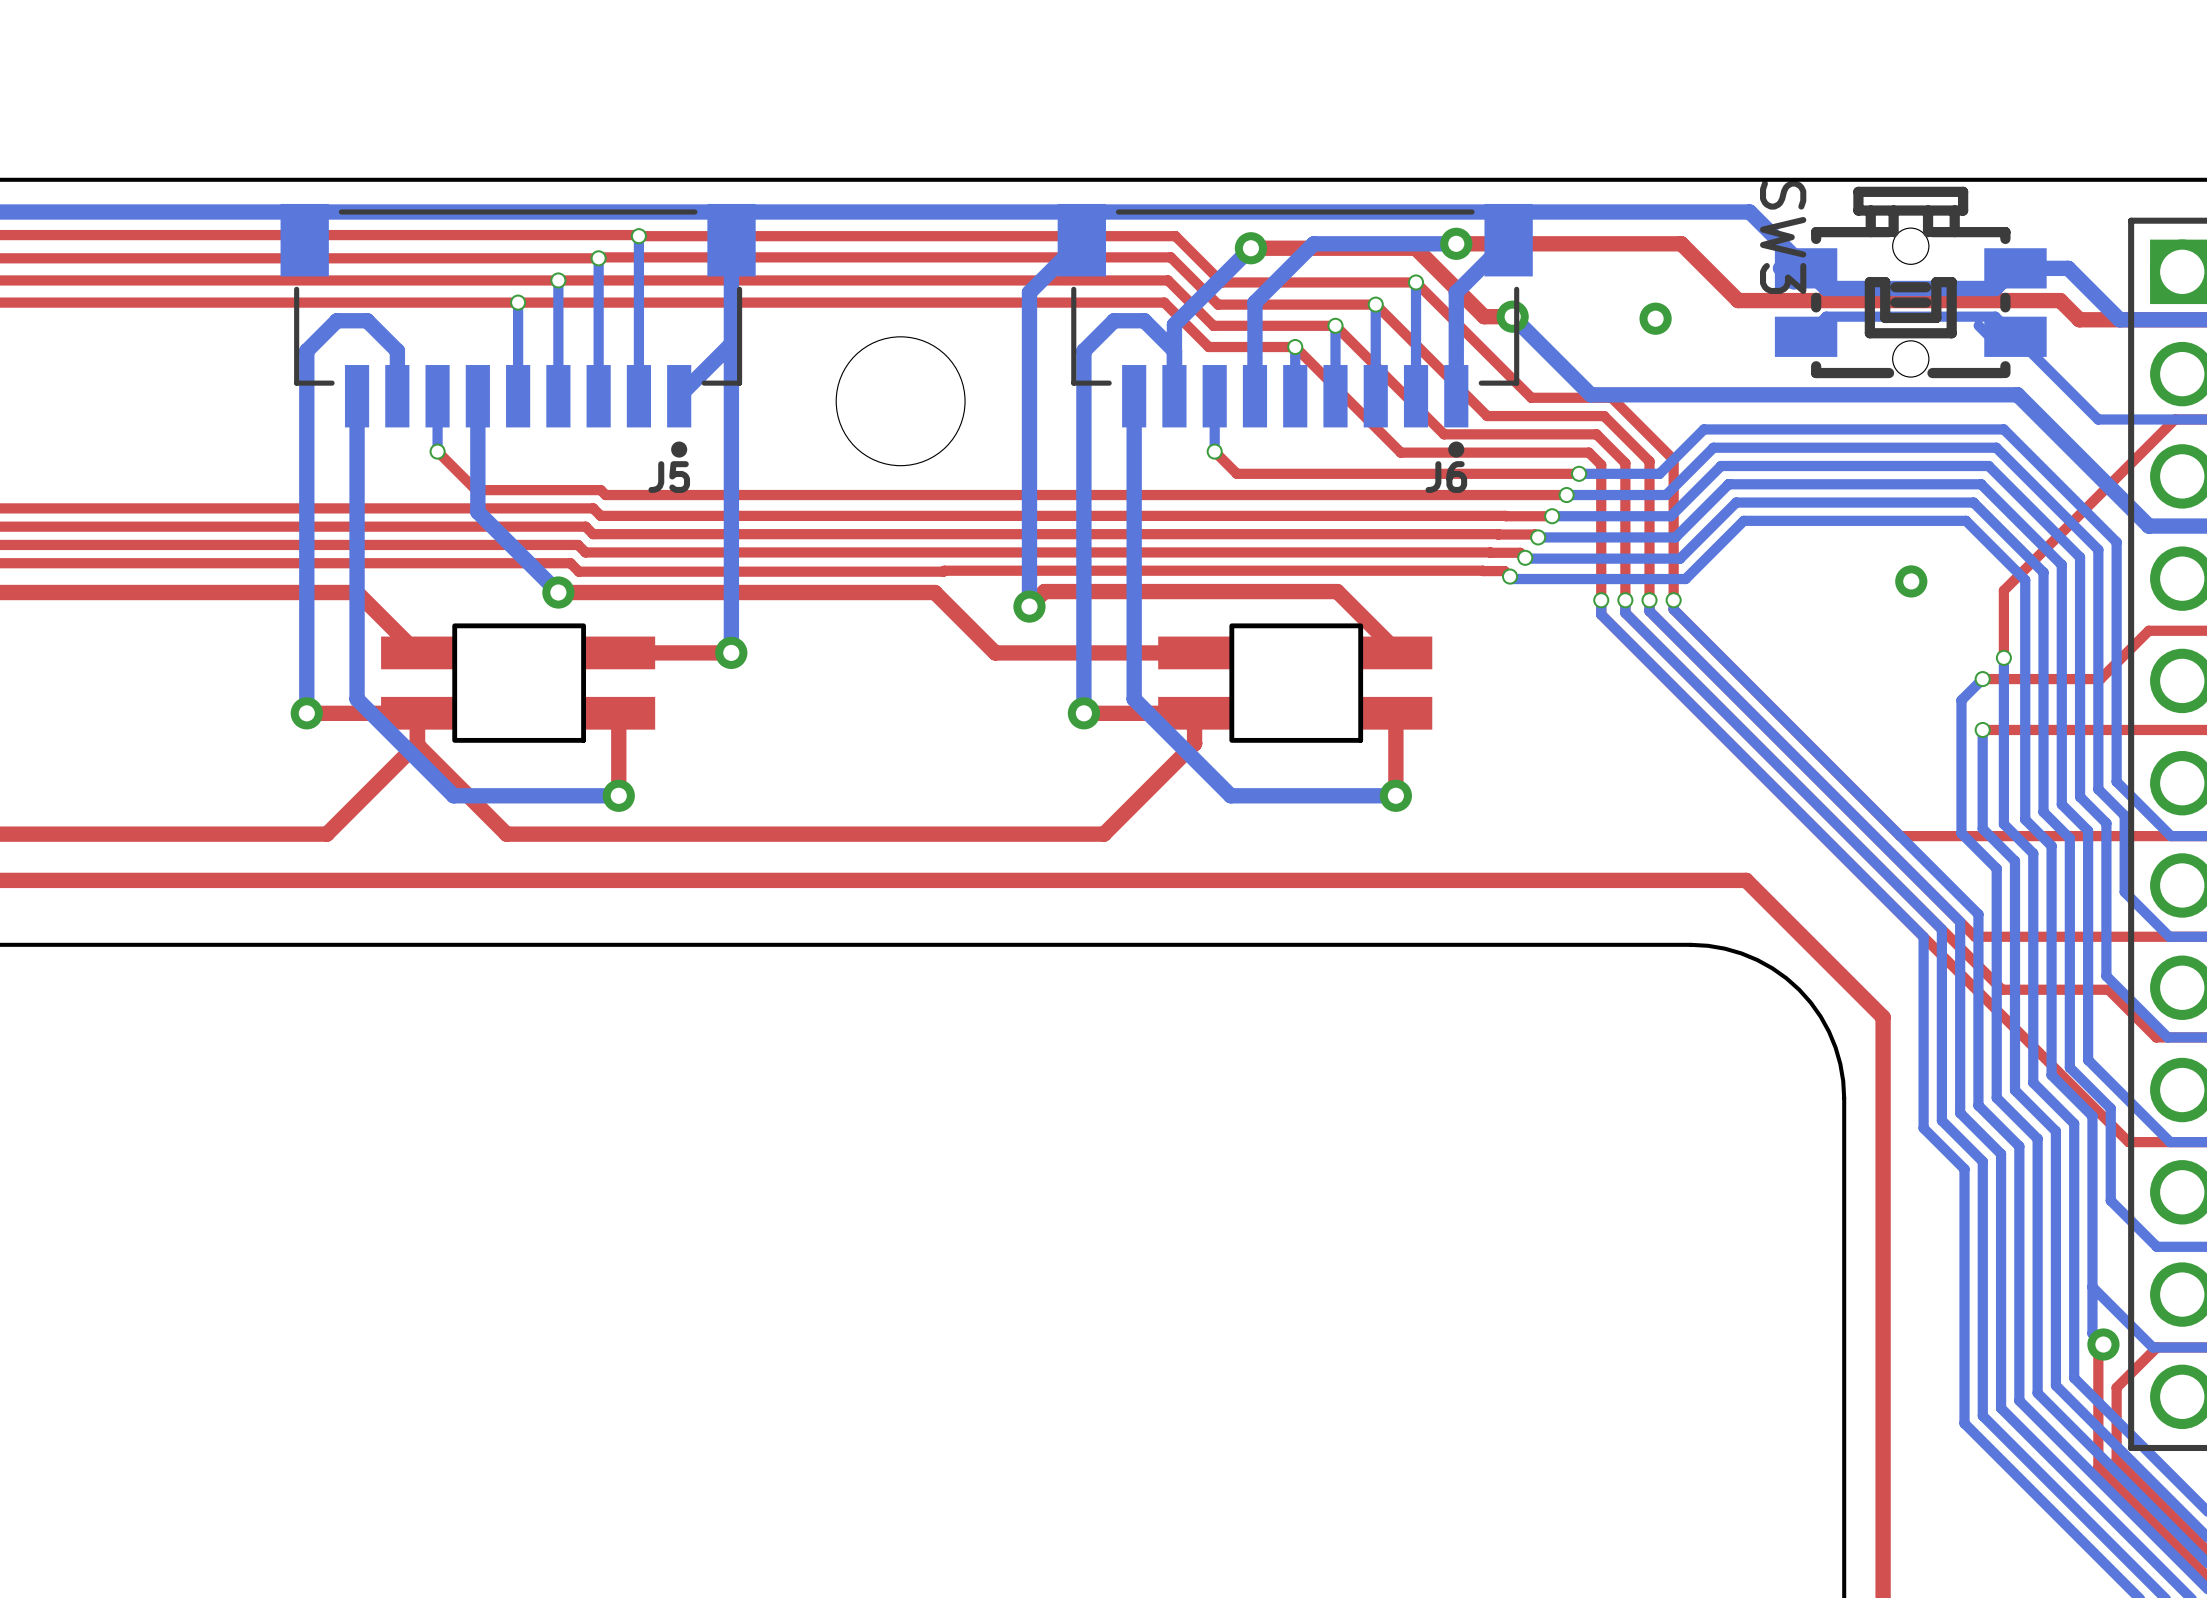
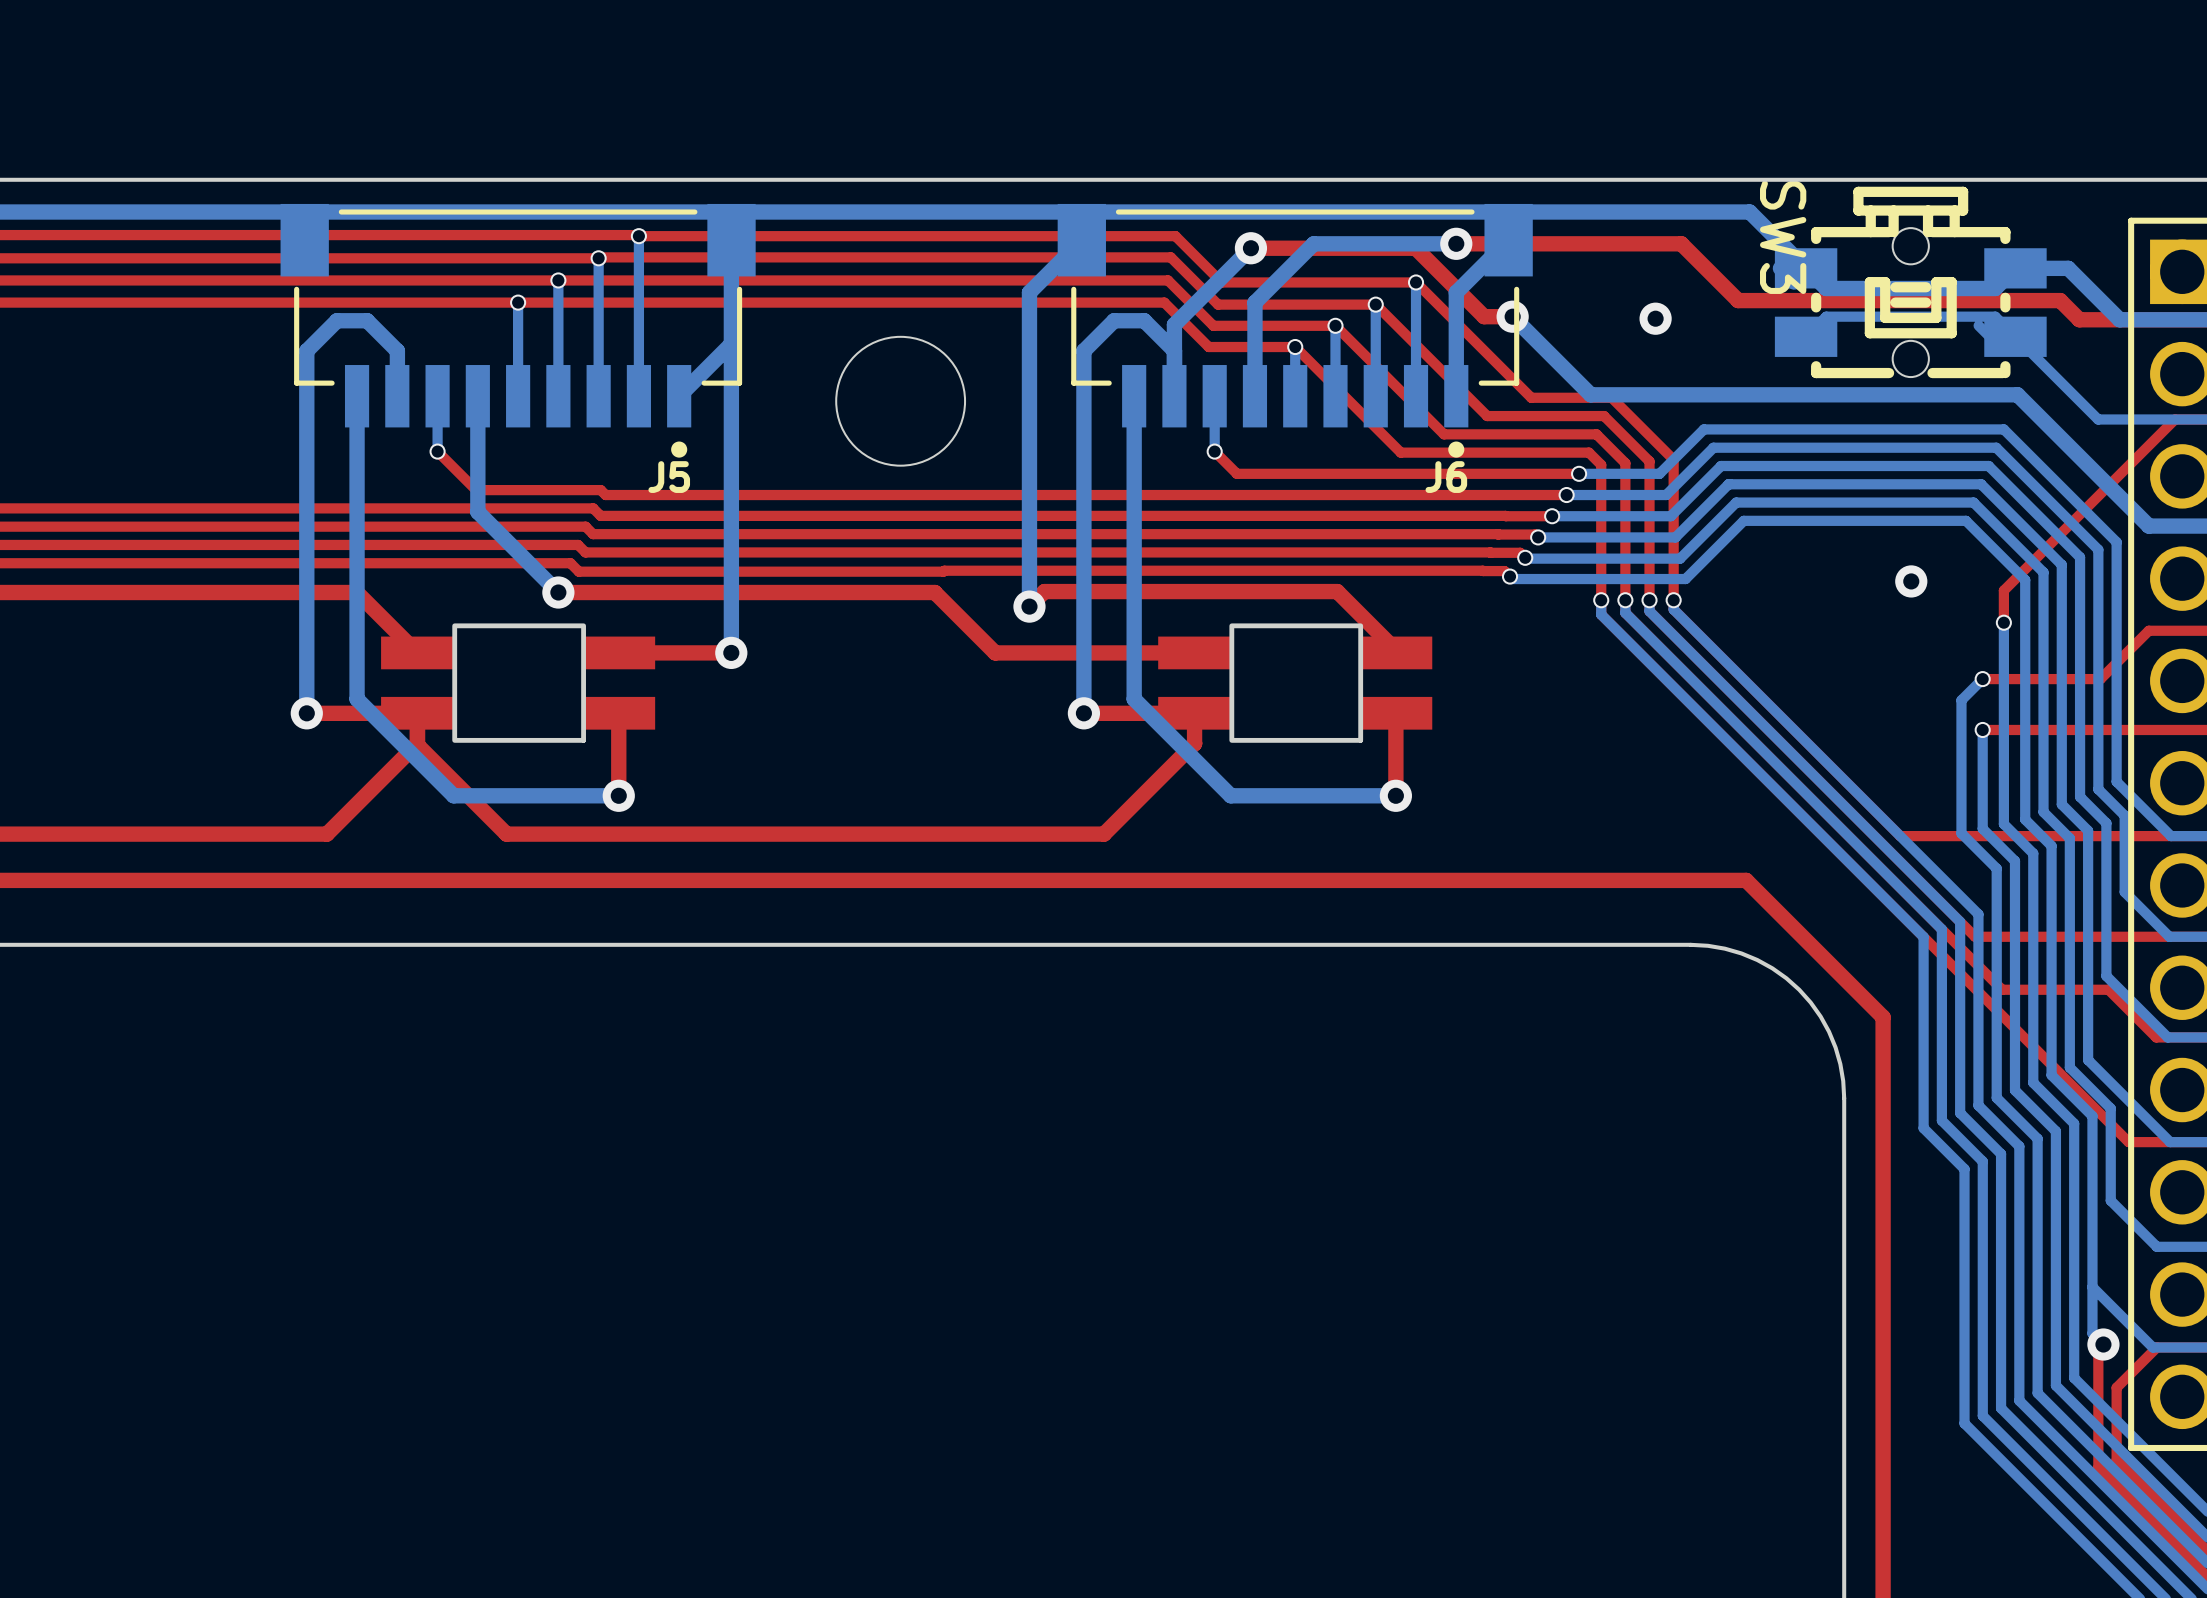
top track: (2003, 622) (2003, 657) -> none
bottom track: none -> (2003, 622) (2003, 657)
via position: (2003, 657) -> (2003, 622)

